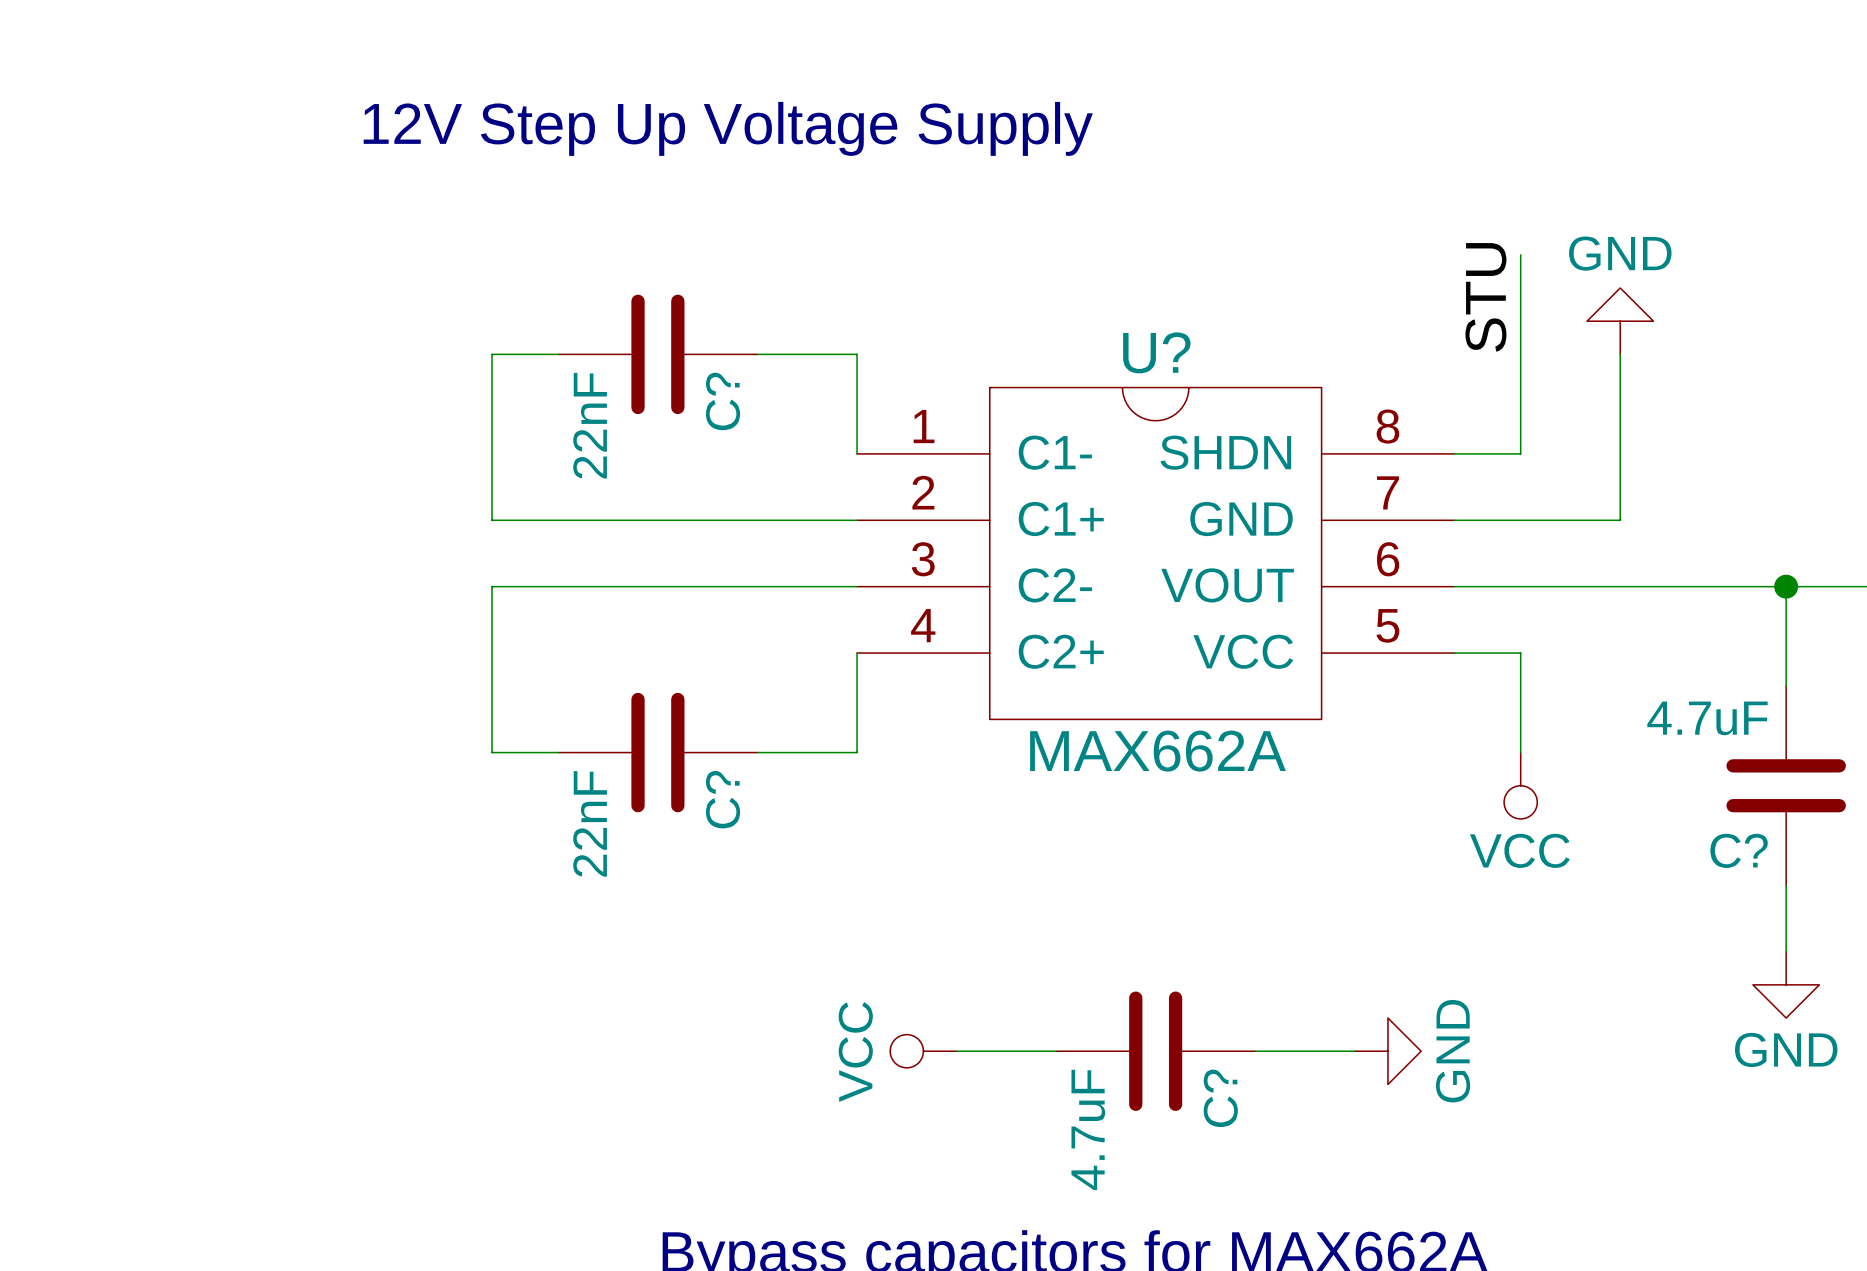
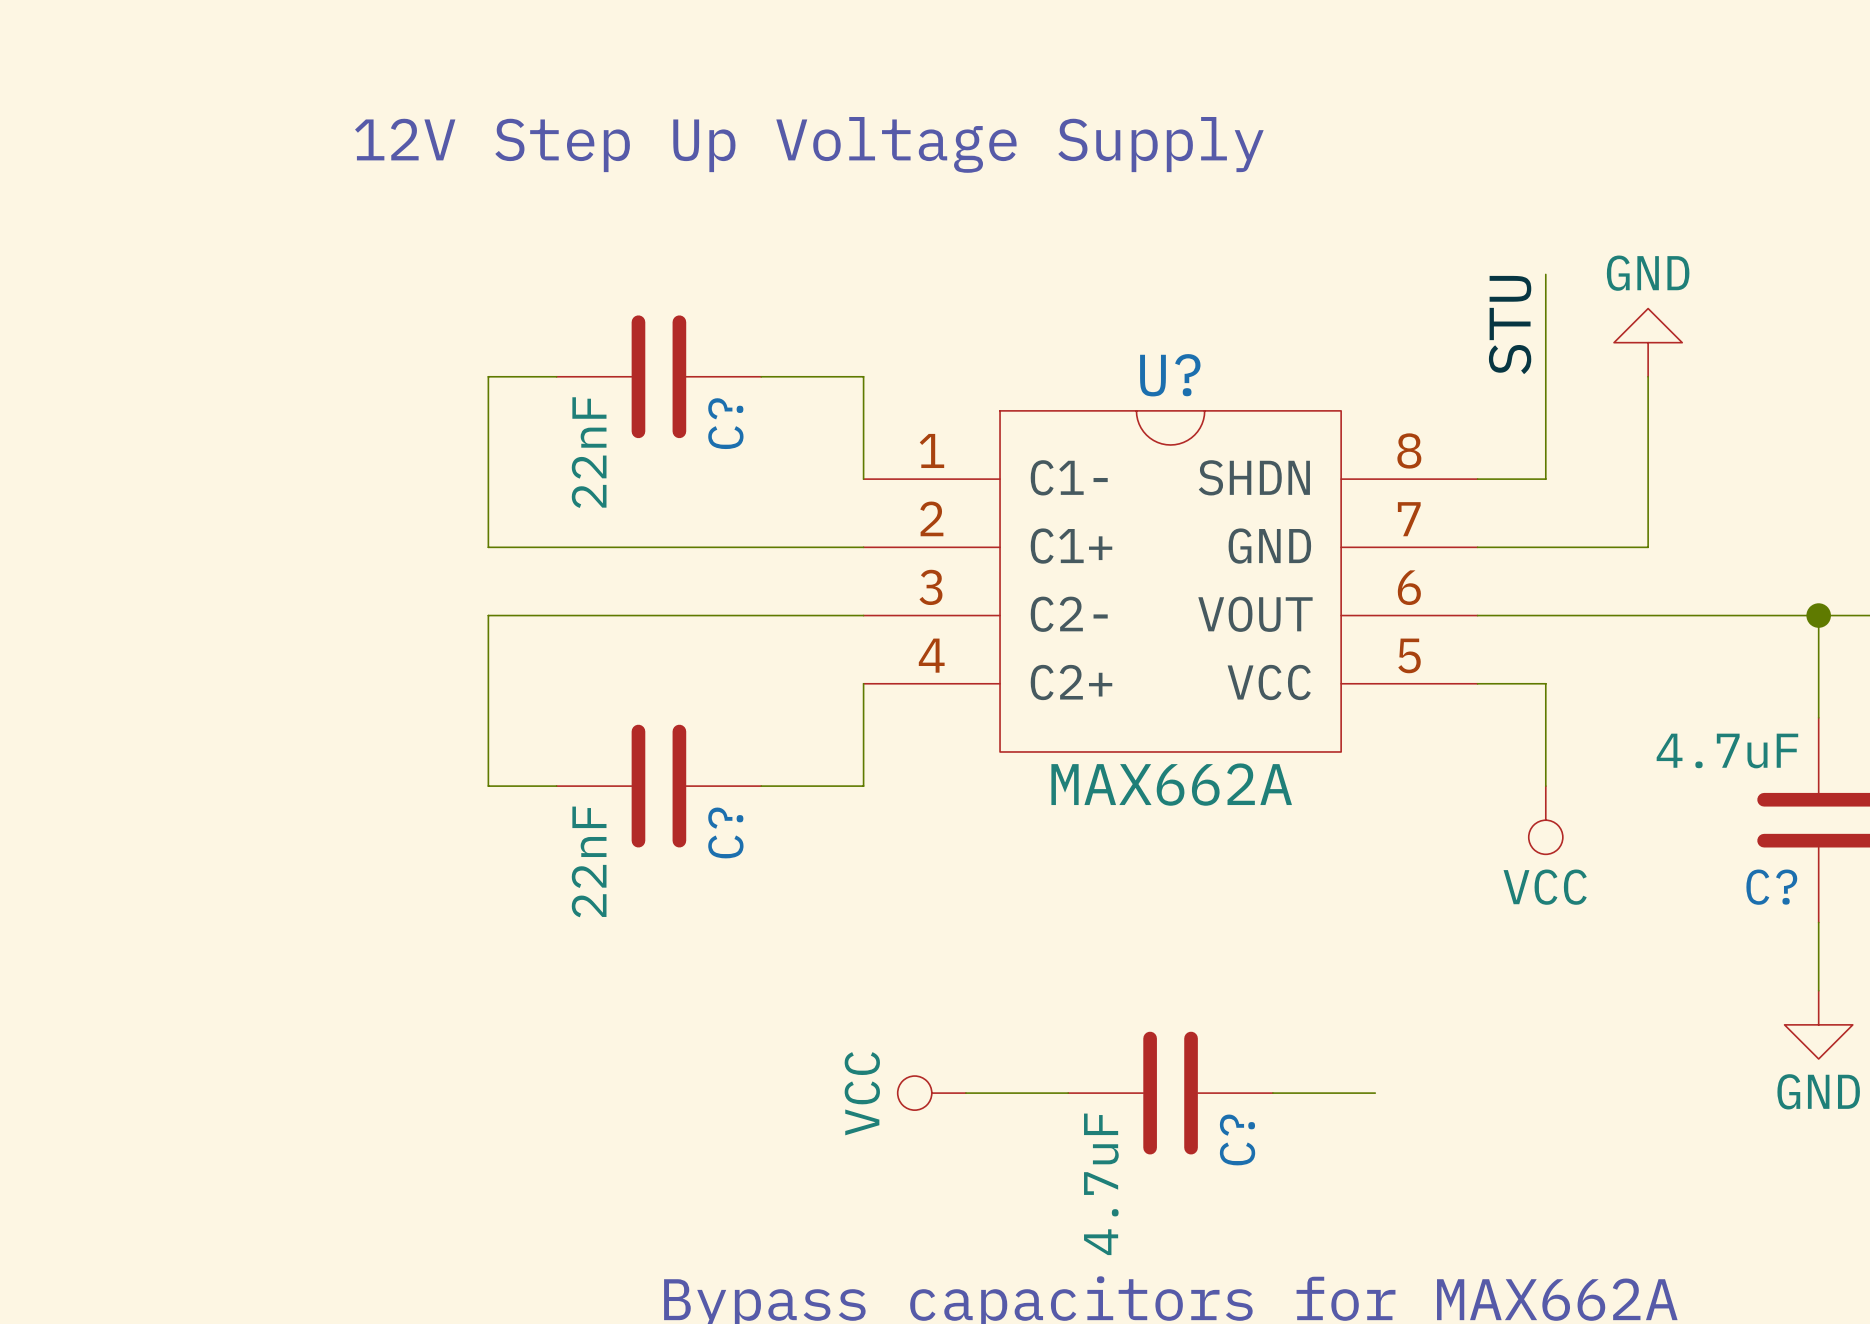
power symbol: GND (1387, 1051) -> none

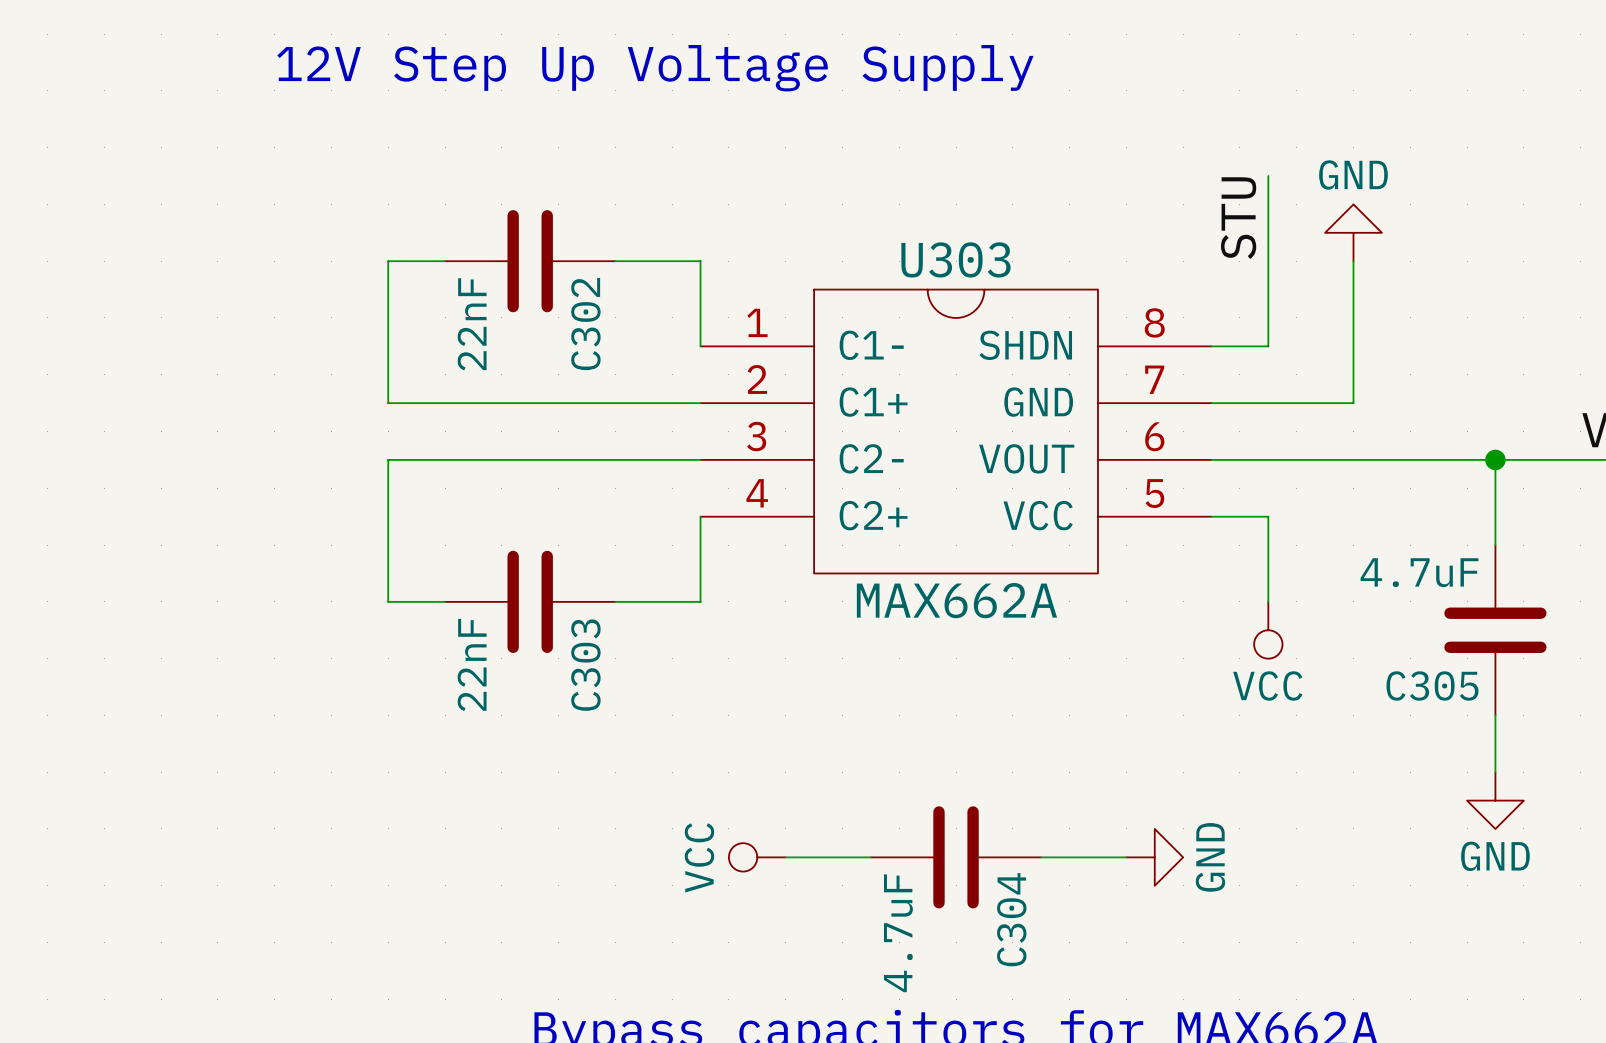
U? name: U? (1170, 375) -> U303 (955, 259)
C? name: C? (725, 423) -> C302 (585, 324)
C? name: C? (725, 832) -> C303 (585, 665)
C? name: C? (1771, 887) -> C305 (1432, 685)
power symbol: none -> GND (1154, 857)
C? name: C? (1237, 1139) -> C304 (1011, 919)

